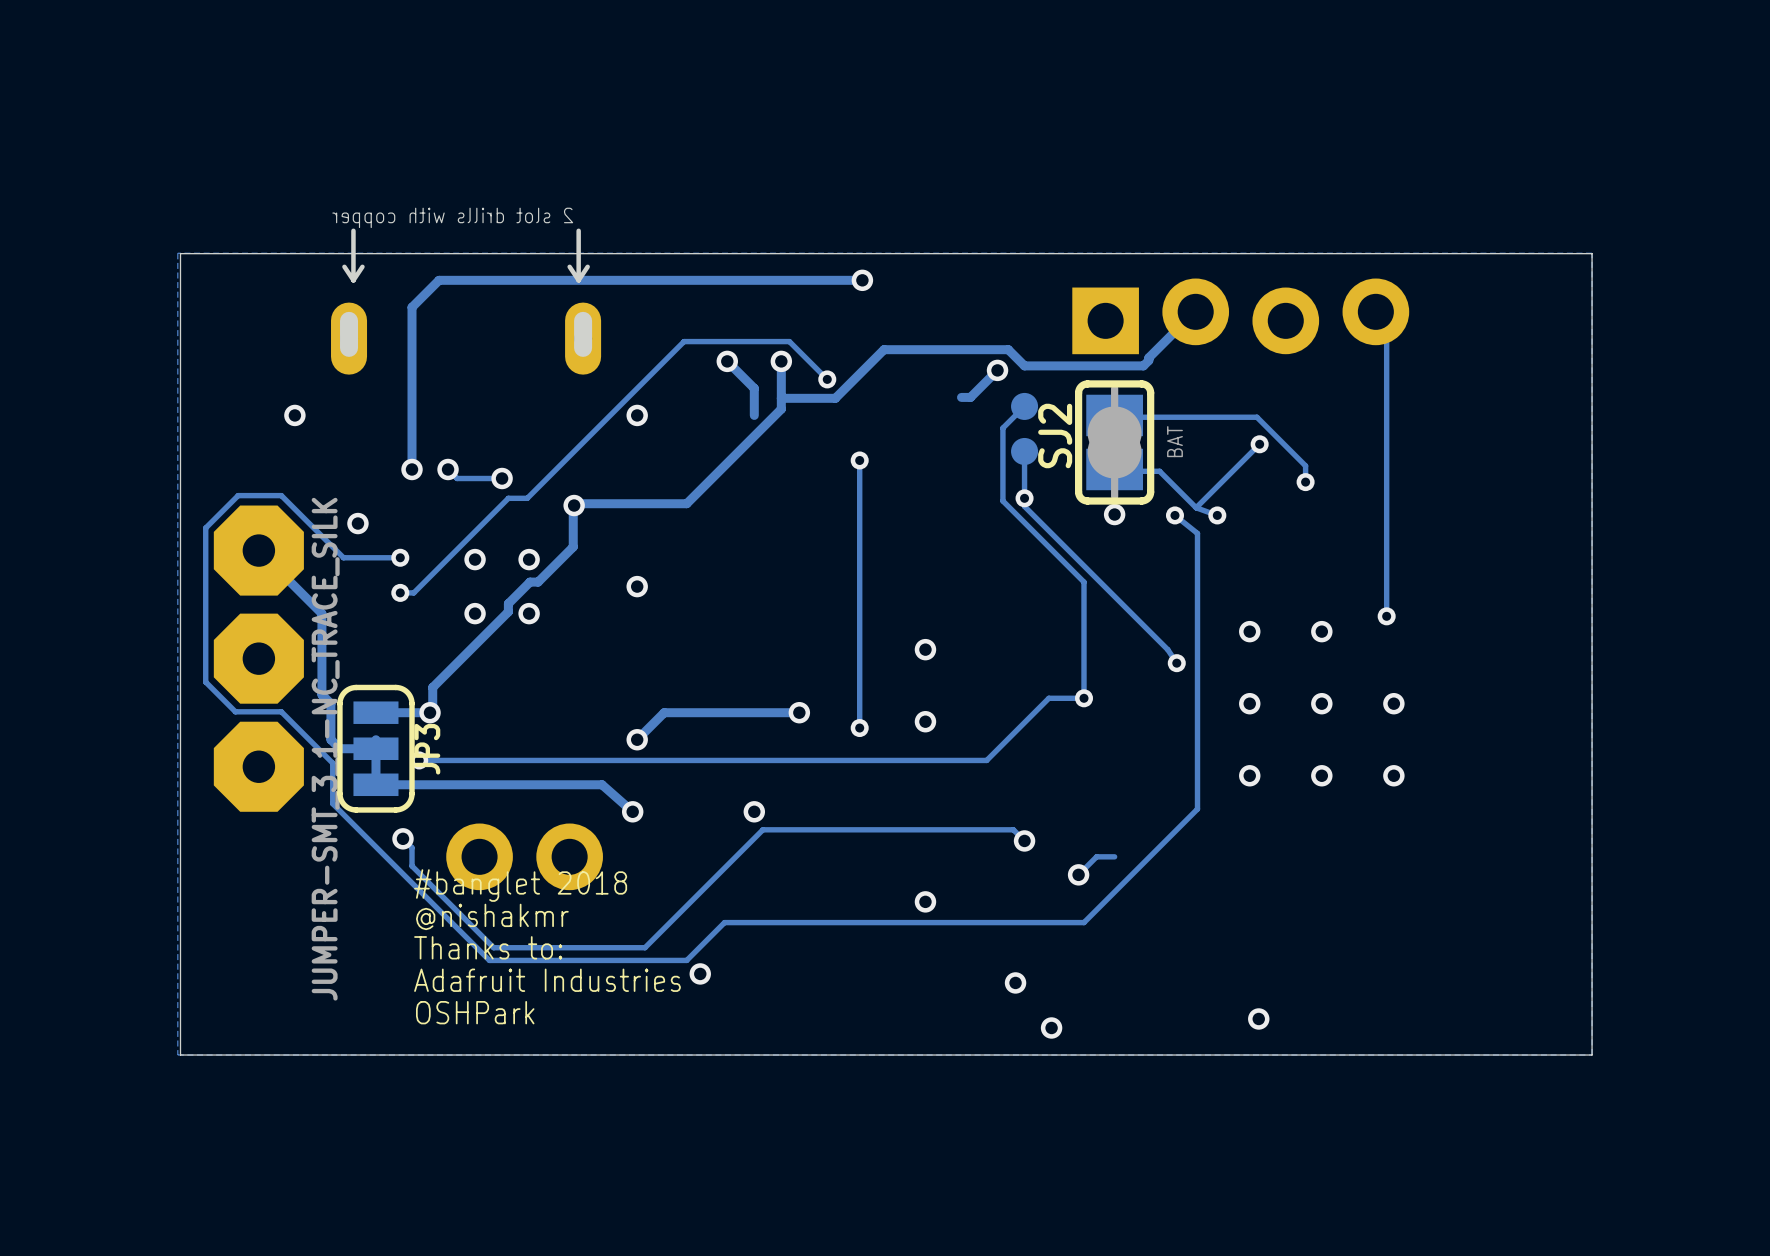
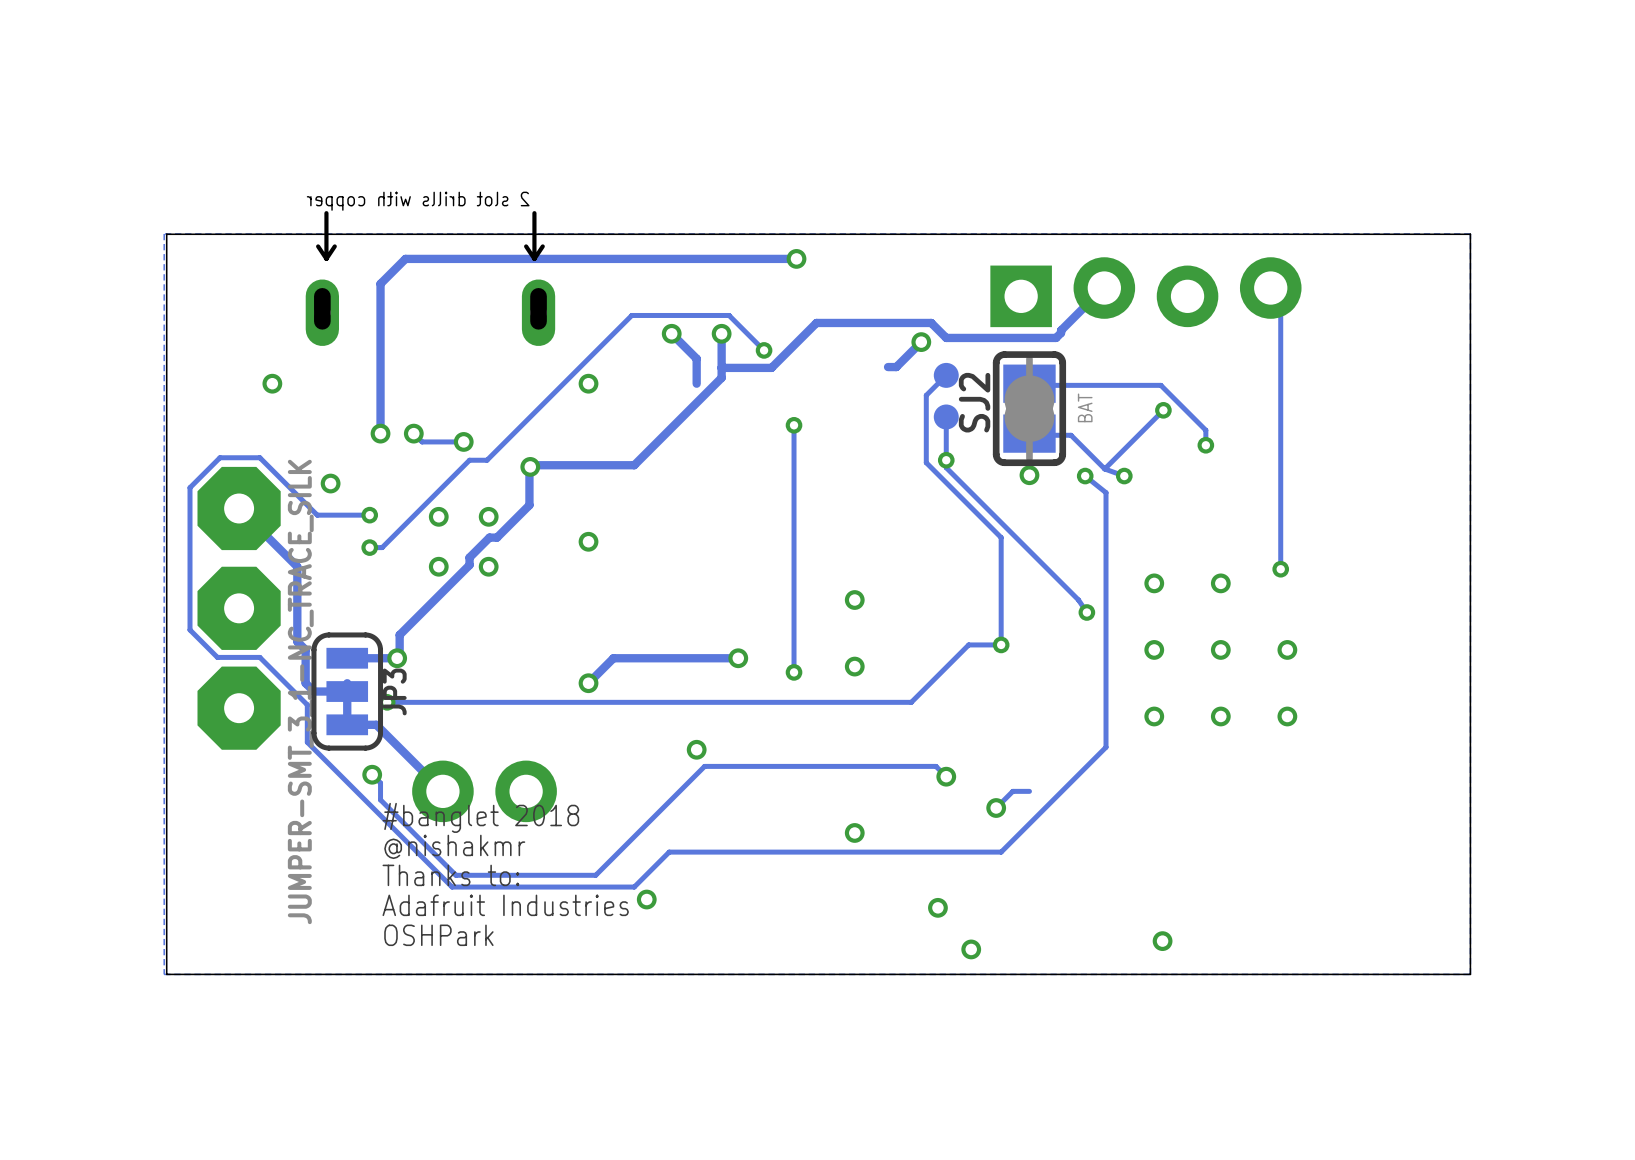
track: (407, 784) (602, 784) (632, 811) -> (376, 724) (442, 791)
via: (632, 811) -> none

